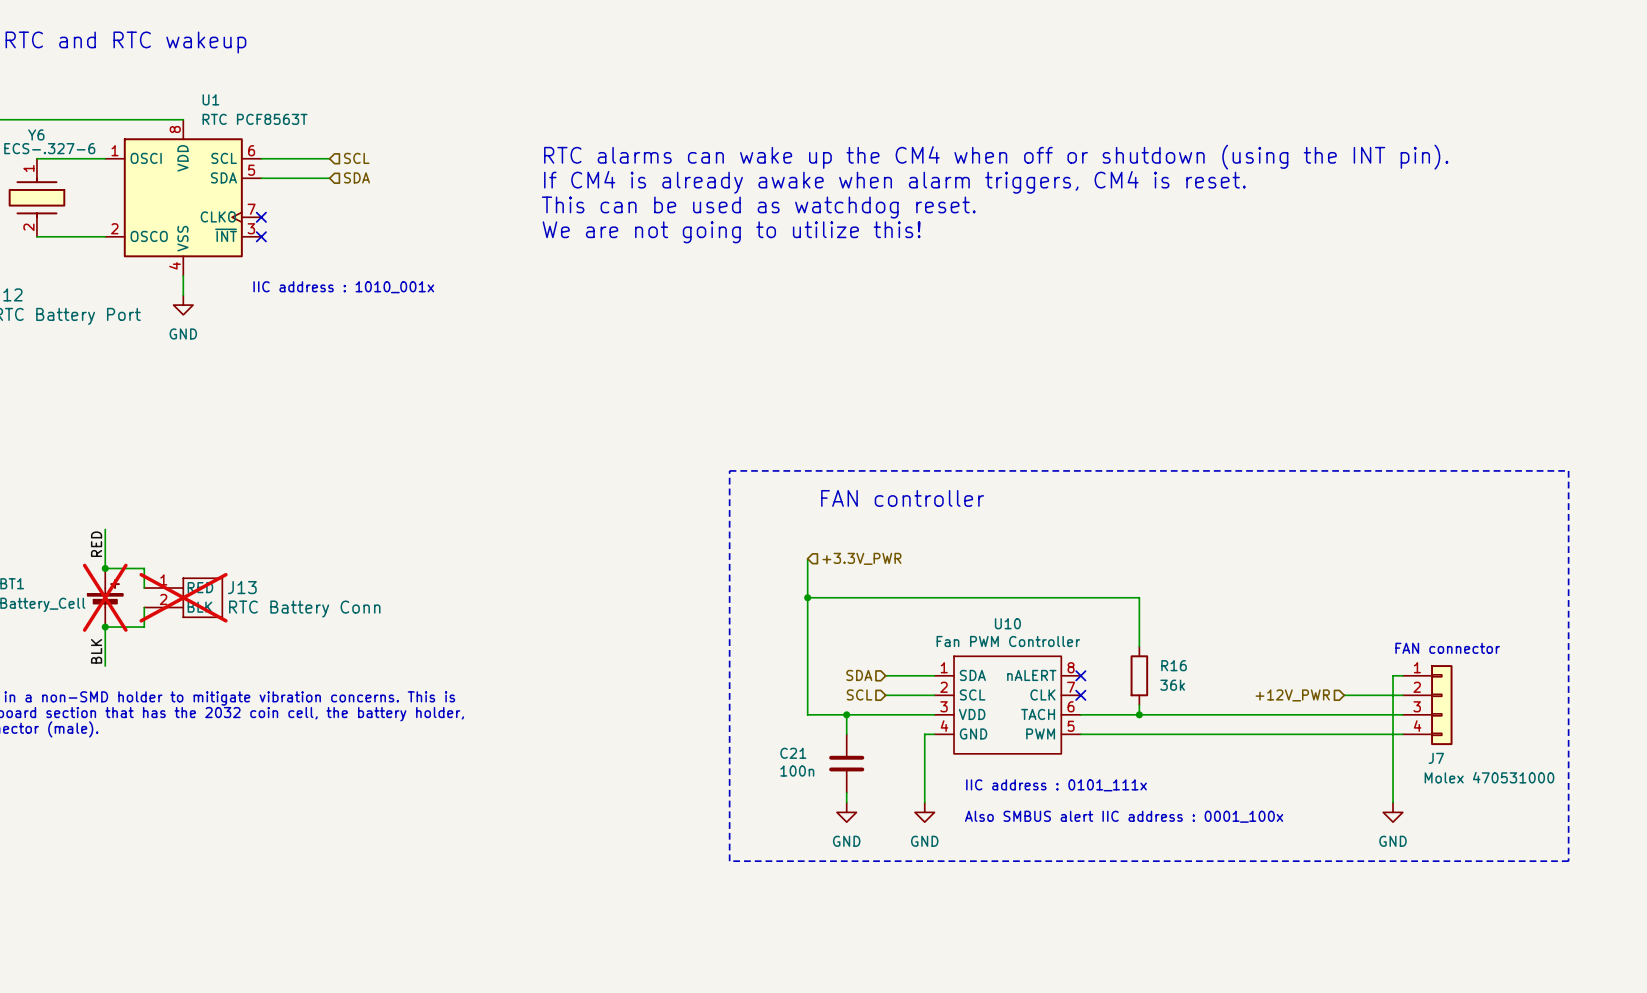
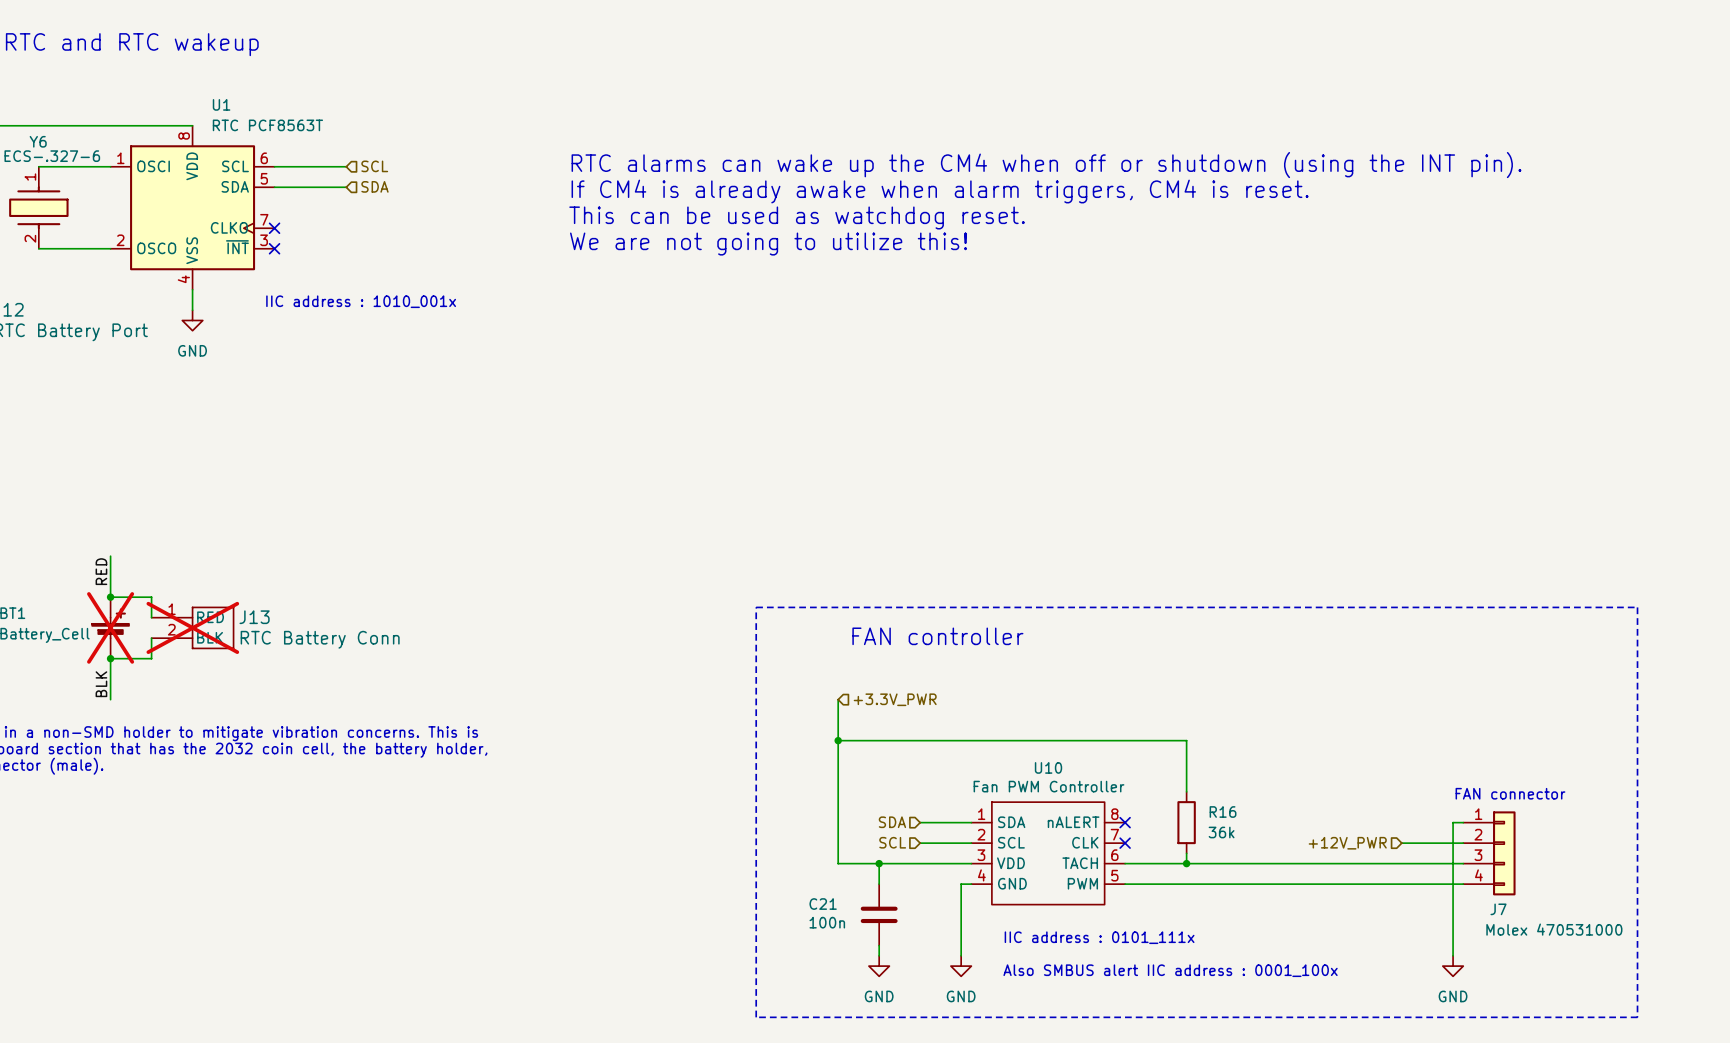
line: (729, 470) (1568, 470) (1568, 861) (729, 861) (729, 470) -> (756, 607) (1637, 607) (1637, 1017) (756, 1017) (756, 607)
text position: FAN controller (902, 498) -> FAN controller (937, 636)
wire: (807, 558) (807, 714) (934, 714) -> (838, 699) (838, 863) (971, 863)
hierarchical label position: +3.3V_PWR (861, 558) -> +3.3V_PWR (895, 699)
wire: (807, 597) (1139, 597) (1139, 646) -> (838, 740) (1186, 740) (1186, 791)
junction: (807, 597) -> none
text position: FAN connector (1447, 648) -> FAN connector (1510, 793)
hierarchical label position: SDA (859, 675) -> SDA (892, 822)
wire: (885, 675) (934, 675) -> (920, 822) (971, 822)
no-connect mark: (1080, 675) -> none
R16 position: (1139, 675) -> (1186, 822)
wire: (1402, 675) (1393, 675) (1393, 802) -> (1401, 843) (1463, 843)
hierarchical label position: SCL (859, 694) -> SCL (892, 842)
wire: (885, 695) (934, 695) -> none
no-connect mark: (1080, 695) -> none
hierarchical label position: +12V_PWR (1292, 695) -> +12V_PWR (1347, 843)
wire: (1344, 695) (1402, 695) -> none
junction: none -> (838, 740)
U10 position: (1007, 705) -> (1048, 853)
wire: (1139, 705) (1139, 714) -> (1186, 853) (1186, 863)
J7 position: (1427, 705) -> (1489, 853)
wire: (846, 714) (846, 734) -> (879, 863) (879, 884)
junction: (846, 714) -> none
wire: (1080, 714) (1402, 714) -> (1125, 863) (1463, 863)
junction: (1139, 714) -> none
wire: (934, 734) (924, 734) (924, 802) -> (920, 843) (971, 843)
wire: (1080, 734) (1402, 734) -> (1125, 884) (1463, 884)
C21 position: (846, 763) -> (879, 914)
no-connect mark: none -> (1125, 822)
wire: none -> (1463, 822) (1453, 822) (1453, 955)
text position: IIC address : 0101_111x (1056, 785) -> IIC address : 0101_111x (1099, 937)
wire: (846, 792) (846, 802) -> (879, 945) (879, 955)
no-connect mark: none -> (1125, 843)
power symbol: GND (846, 812) -> none
power symbol: GND (924, 812) -> none
power symbol position: GND (1393, 812) -> GND (1453, 966)
text position: Also SMBUS alert IIC address : 0001_100x (1124, 816) -> Also SMBUS alert IIC address : 0001_100x (1170, 970)
junction: none -> (879, 863)
junction: none -> (1186, 863)
wire: none -> (971, 884) (961, 884) (961, 955)
power symbol: none -> GND (879, 966)
power symbol: none -> GND (961, 966)

